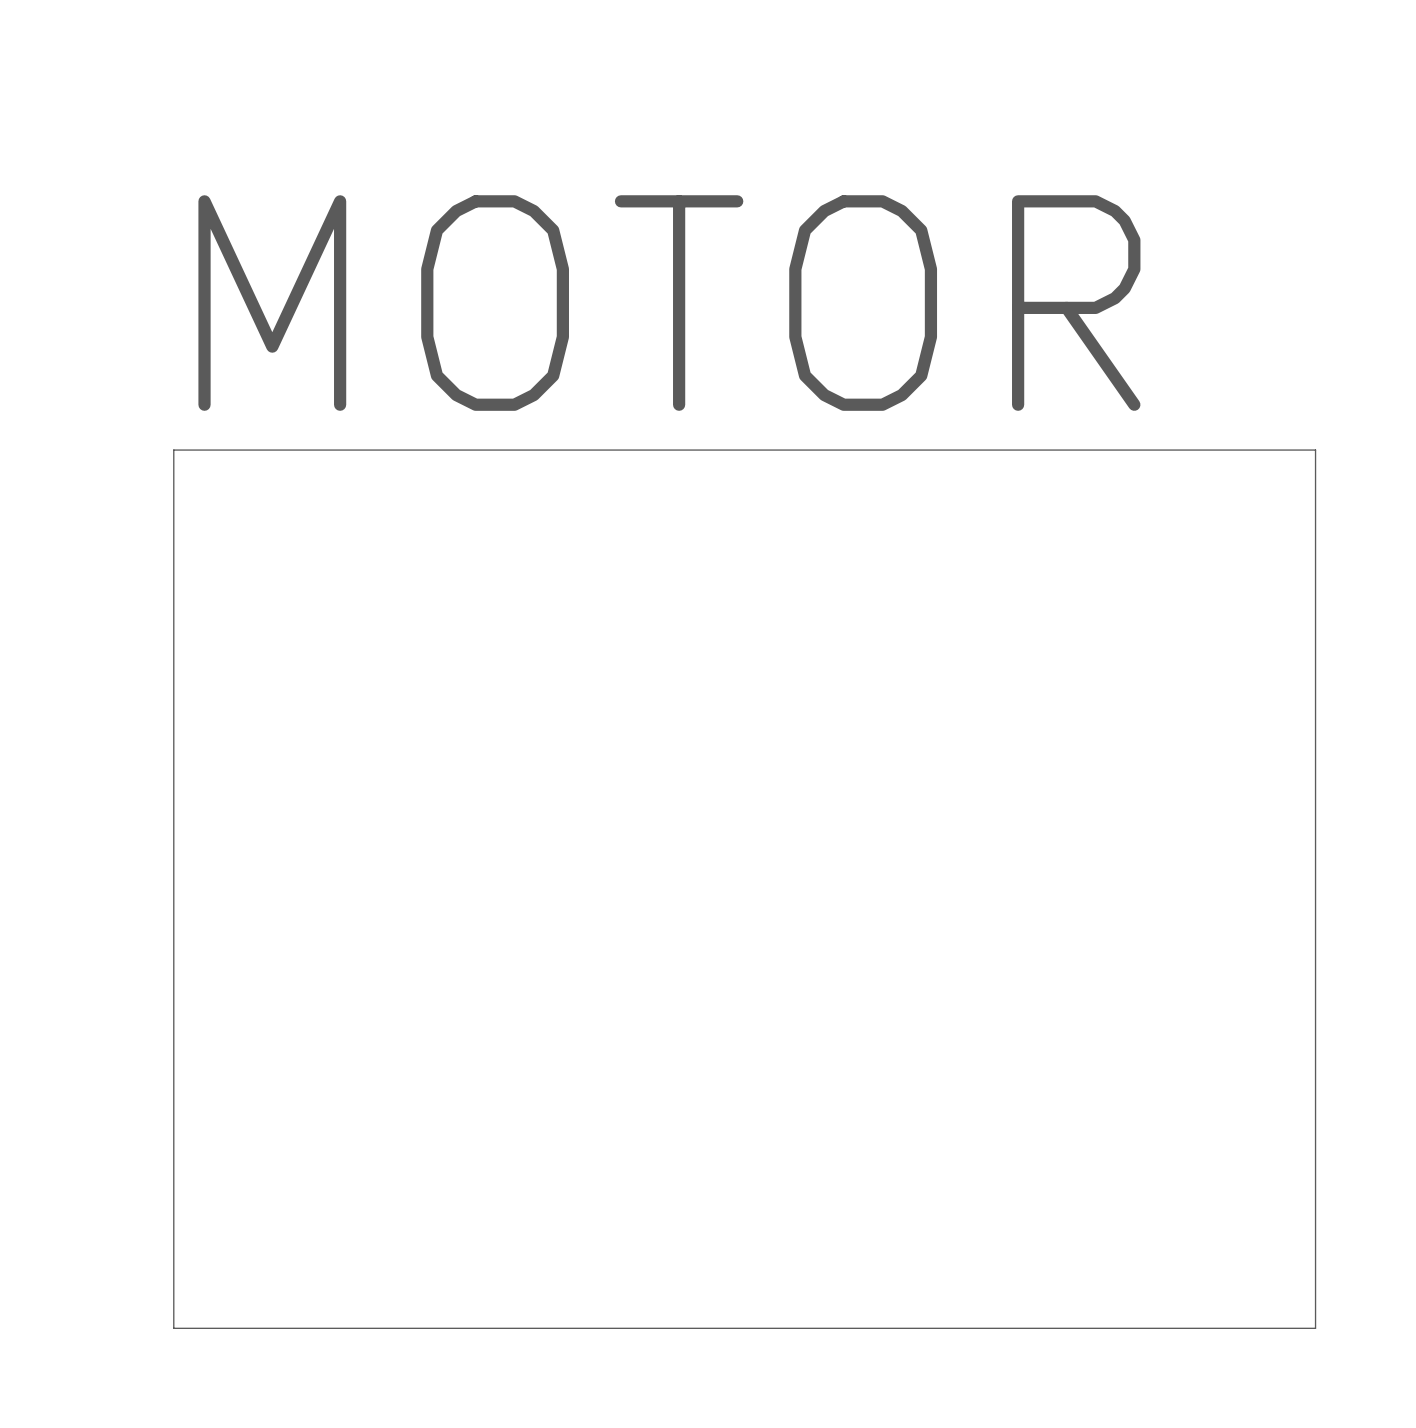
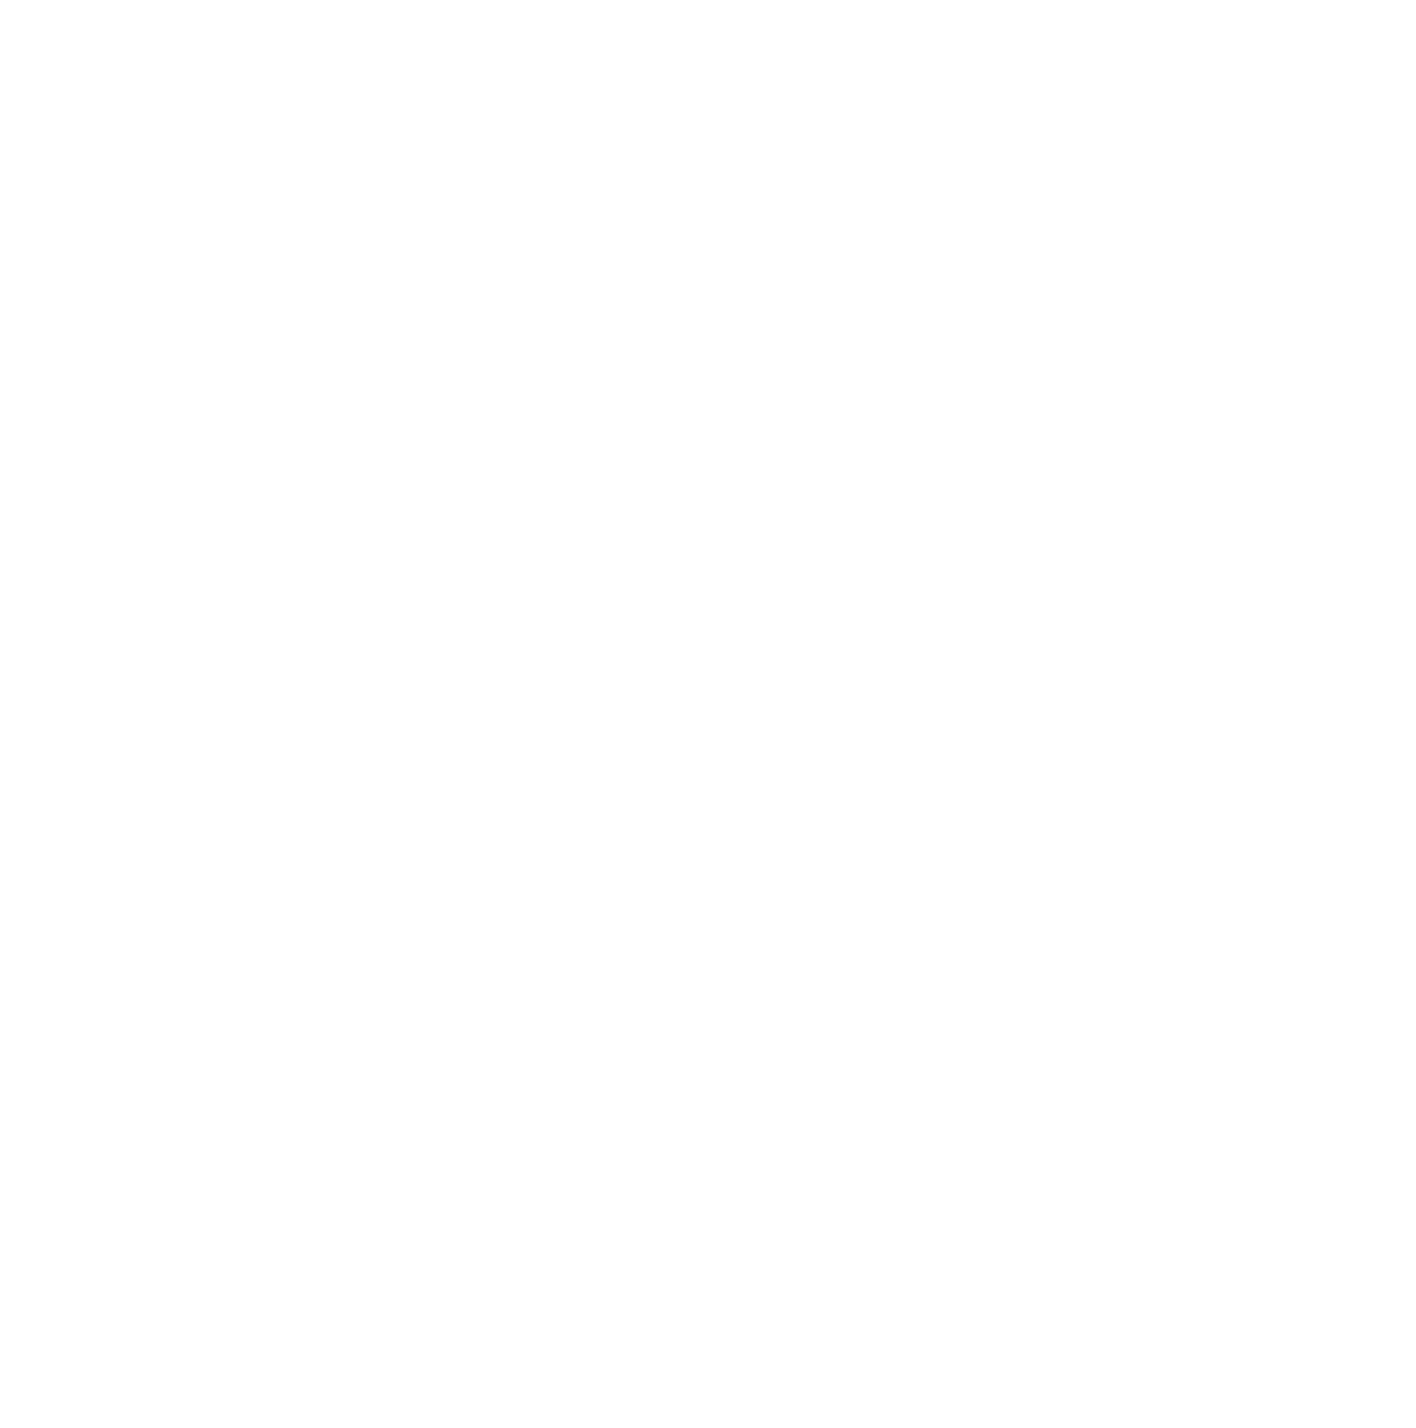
text: MOTOR (669, 303) -> none
line: (173, 450) (1315, 450) (1315, 1328) (173, 1328) (173, 450) -> none

